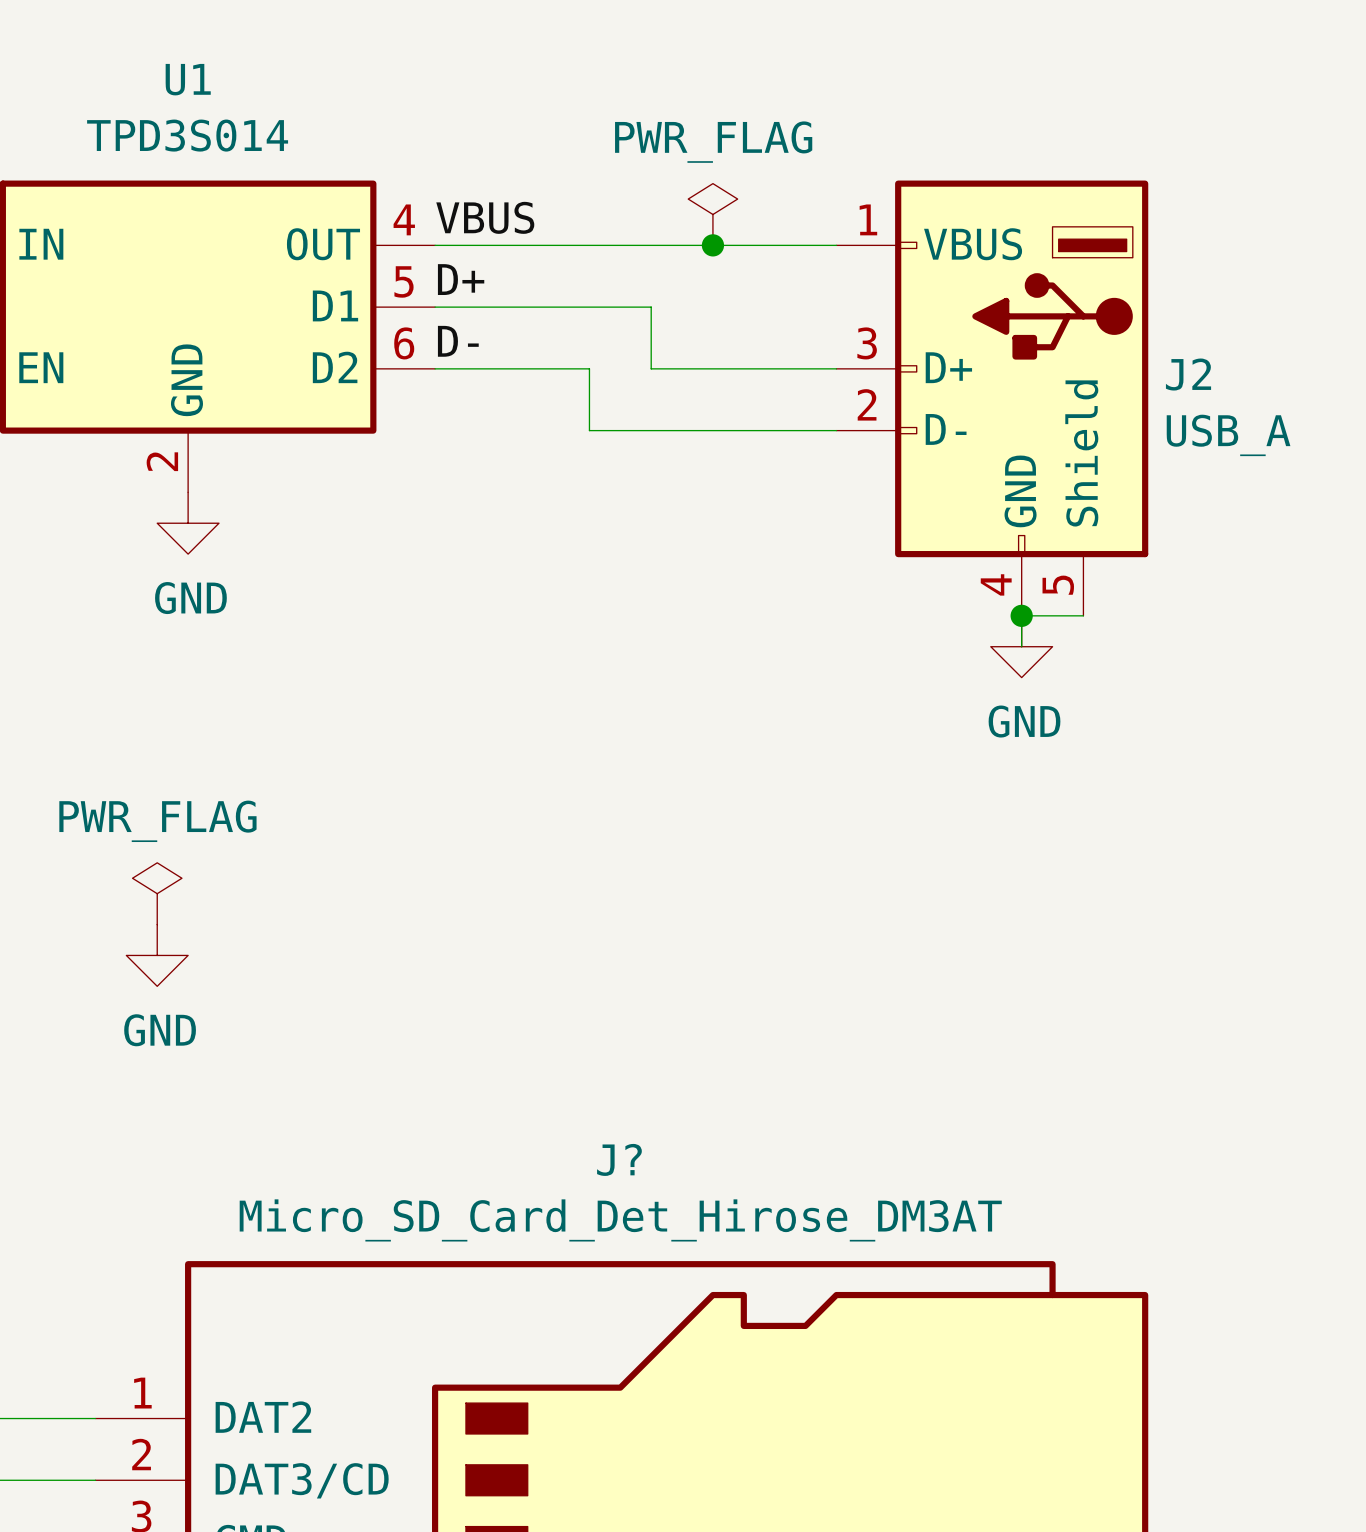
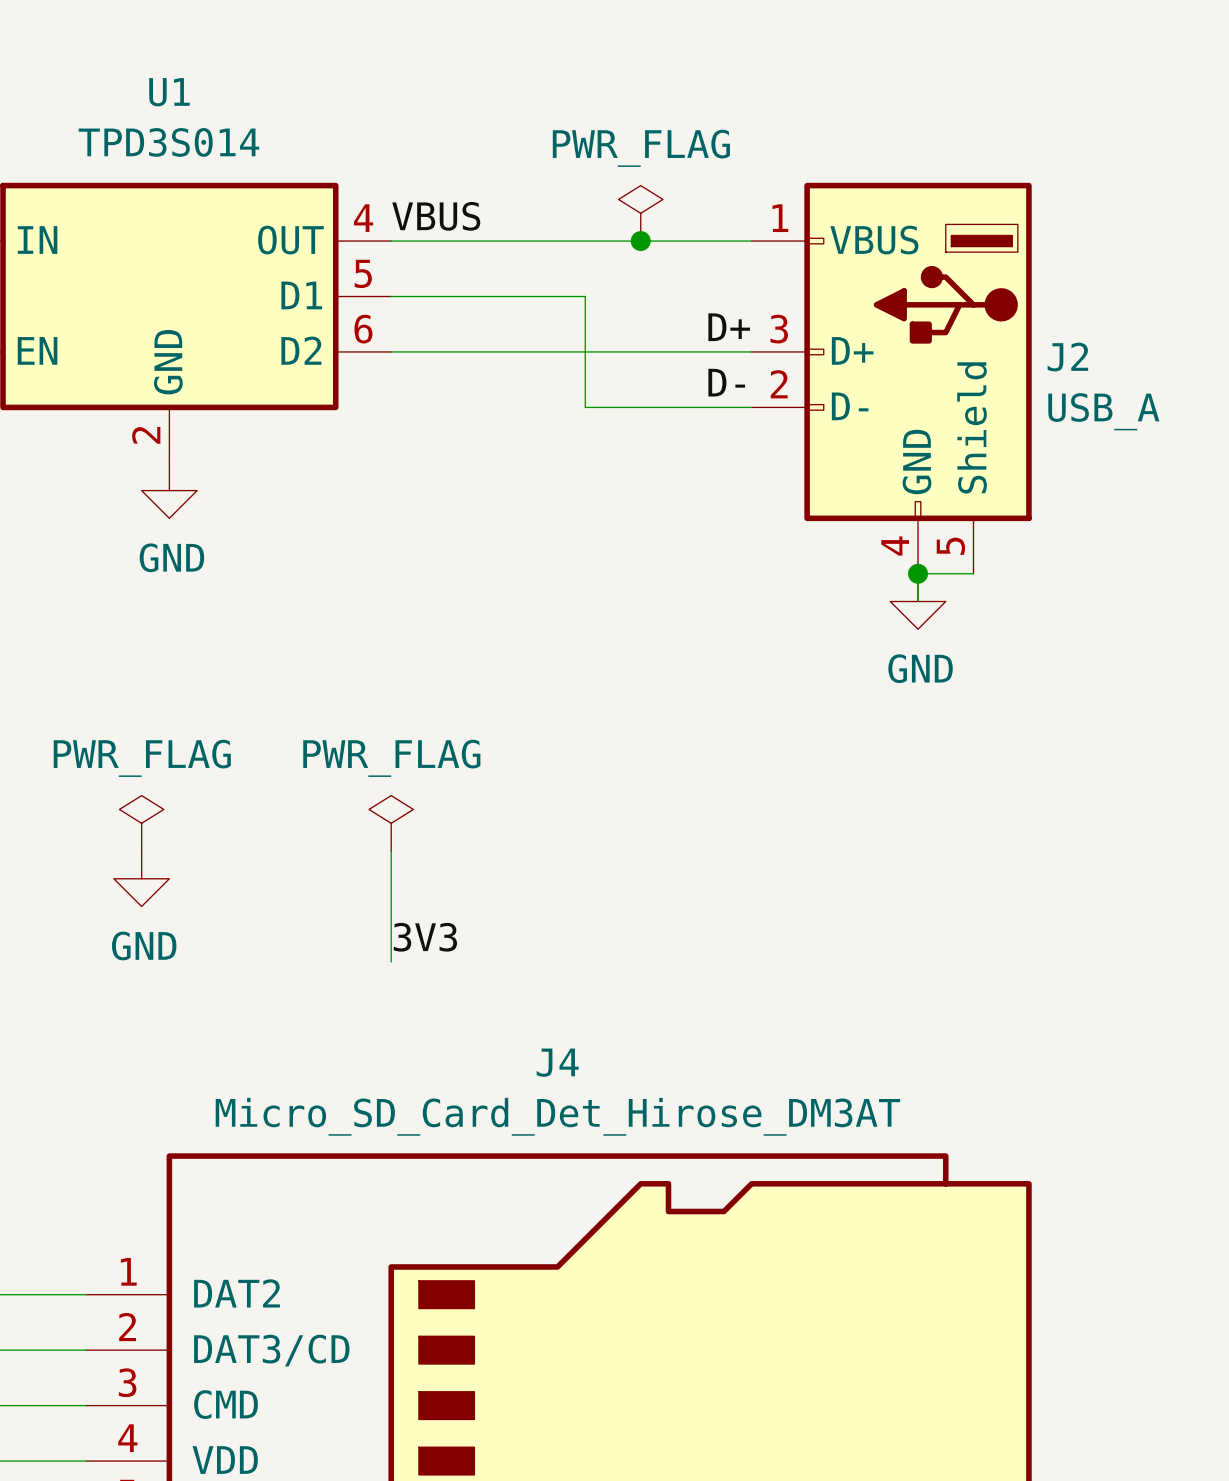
label position: D+ (461, 279) -> D+ (729, 327)
label position: D- (458, 341) -> D- (726, 382)
wire: (589, 368) (589, 430) (651, 430) -> (529, 351) (585, 351) (585, 407)
power symbol: none -> PWR_FLAG (391, 823)
wire: none -> (391, 851) (391, 961)
label: none -> 3V3 (425, 937)
J? name: J? (619, 1159) -> J4 (557, 1062)

